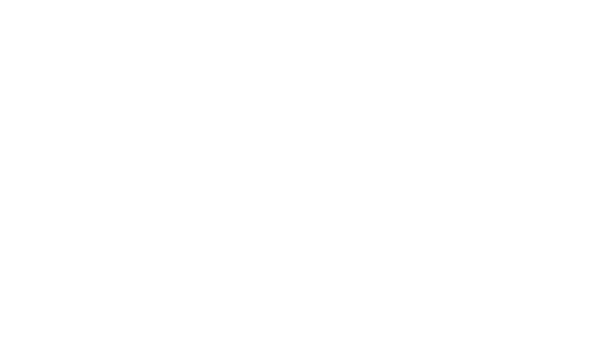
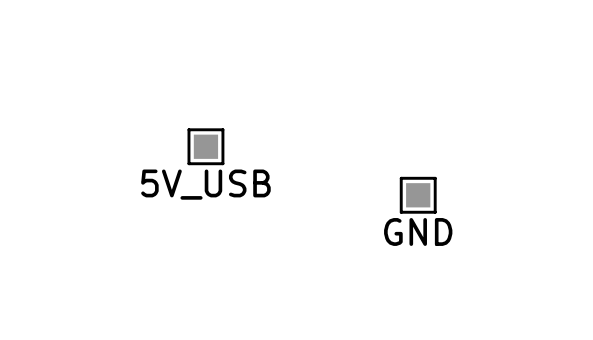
part: none -> 5V_USB (205, 146)
part: none -> GND (418, 195)

